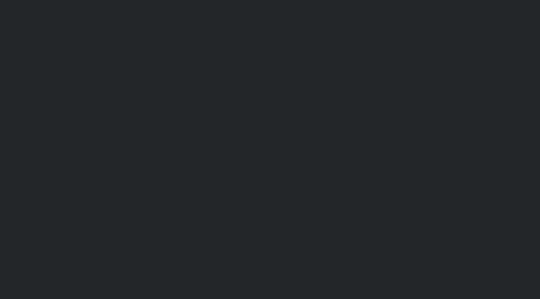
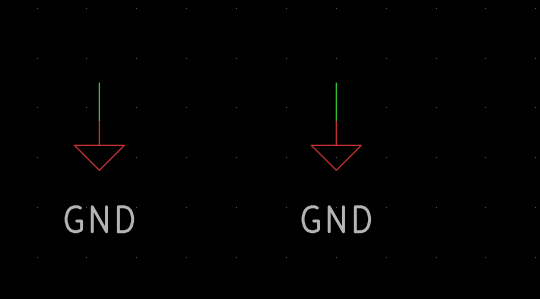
wire: none -> (99, 83) (99, 120)
wire: none -> (336, 83) (336, 120)
power symbol: none -> GND (99, 145)
power symbol: none -> GND (336, 145)

